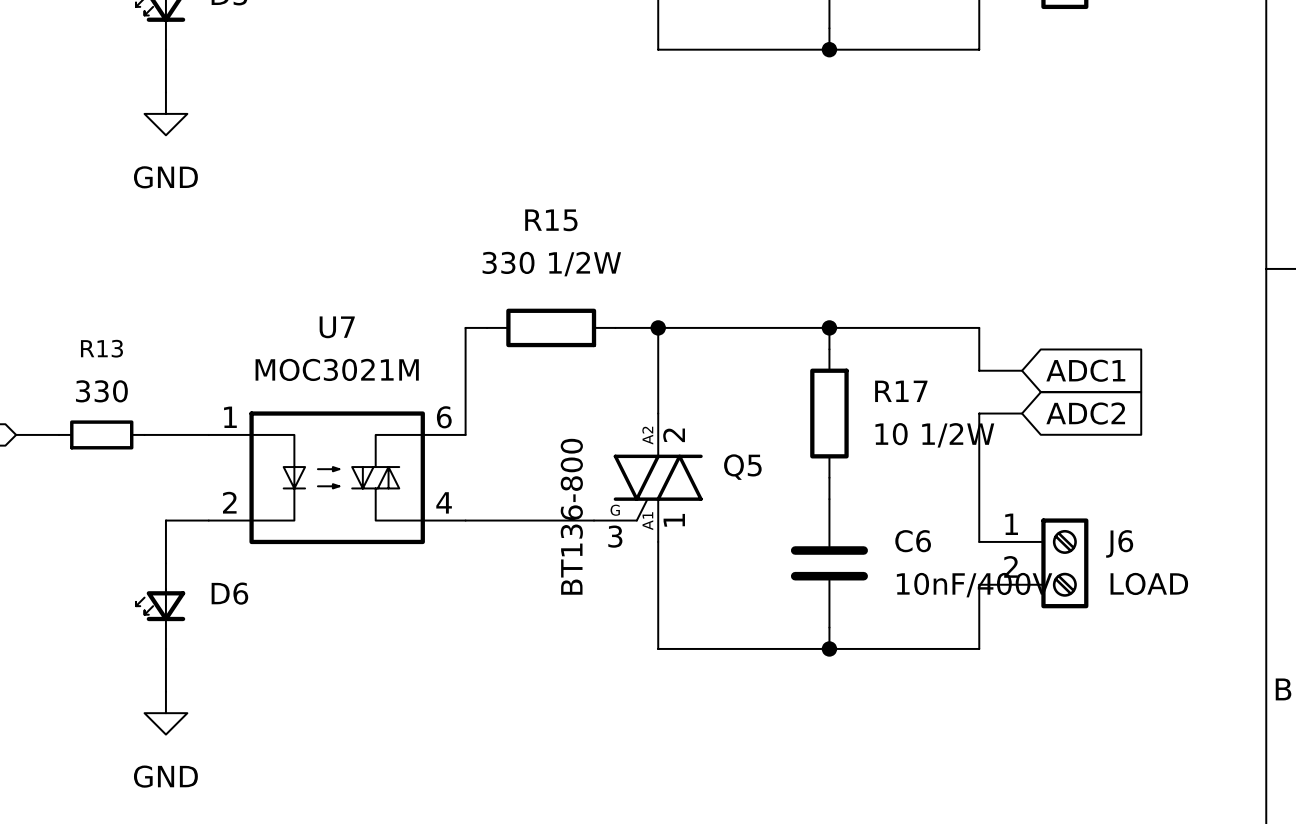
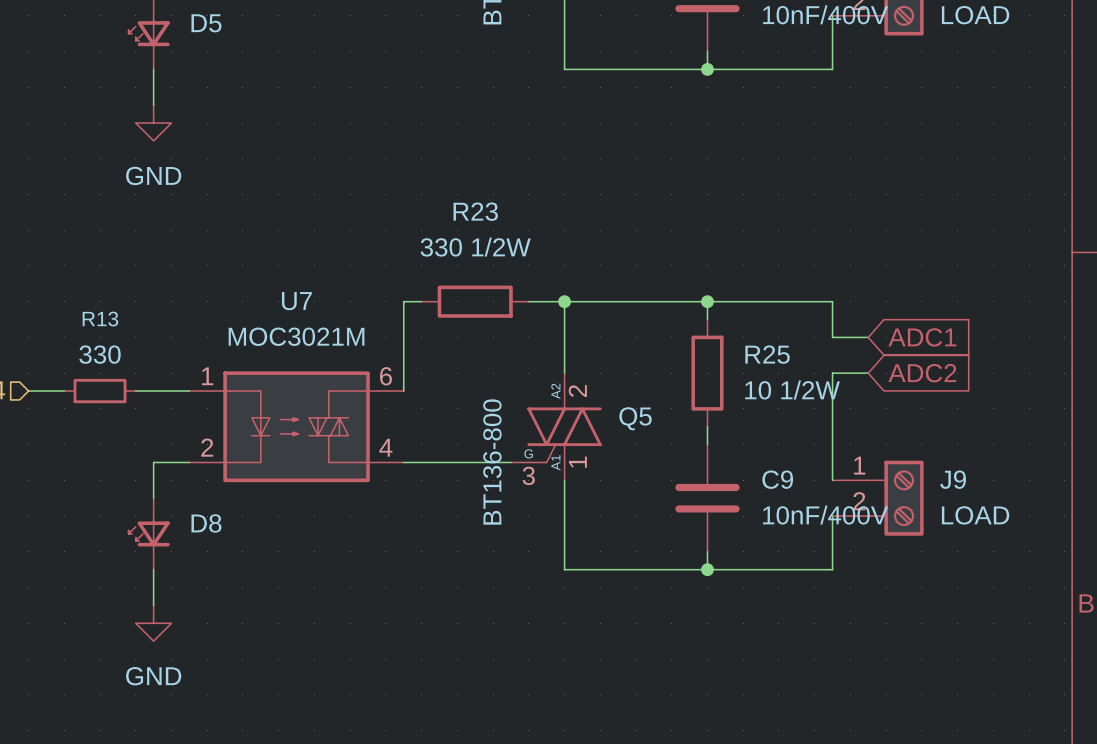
R15 name: R15 (551, 220) -> R23 (475, 211)
R17 name: R17 (901, 391) -> R25 (767, 354)
C6 name: C6 (913, 541) -> C9 (777, 479)
J6 name: J6 (1119, 543) -> J9 (953, 479)
D6 name: D6 (229, 593) -> D8 (206, 523)

